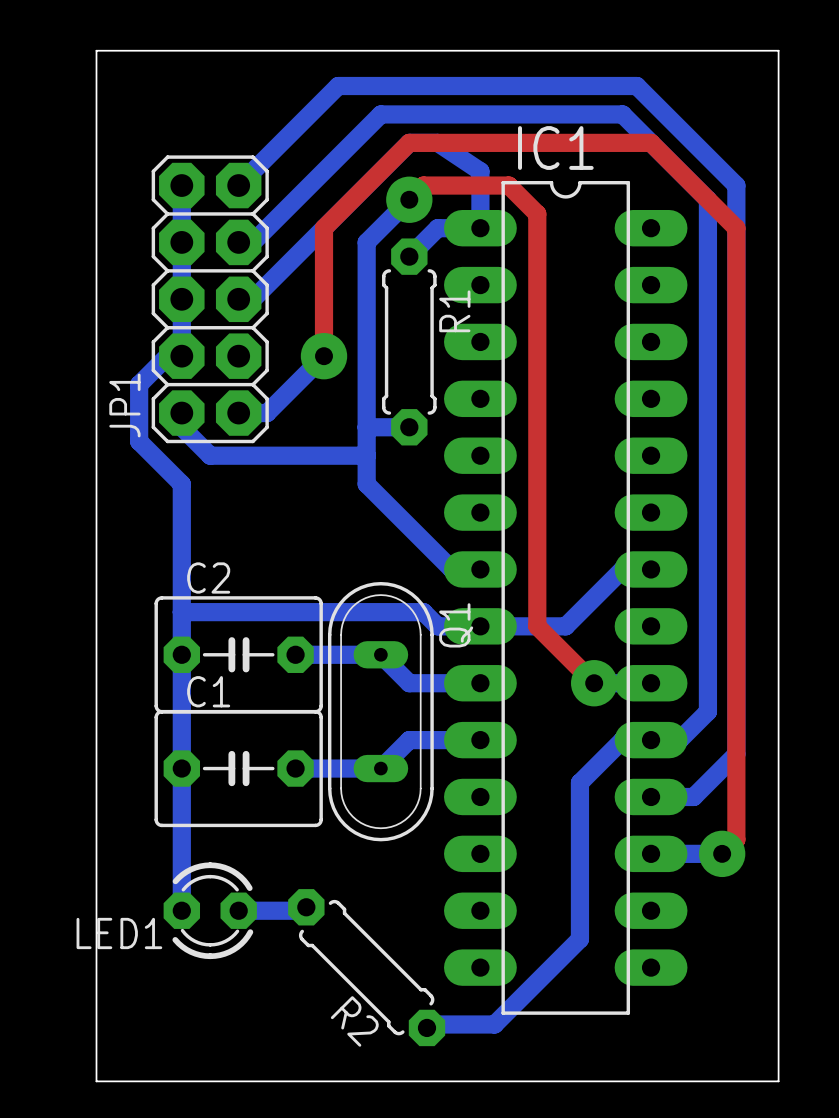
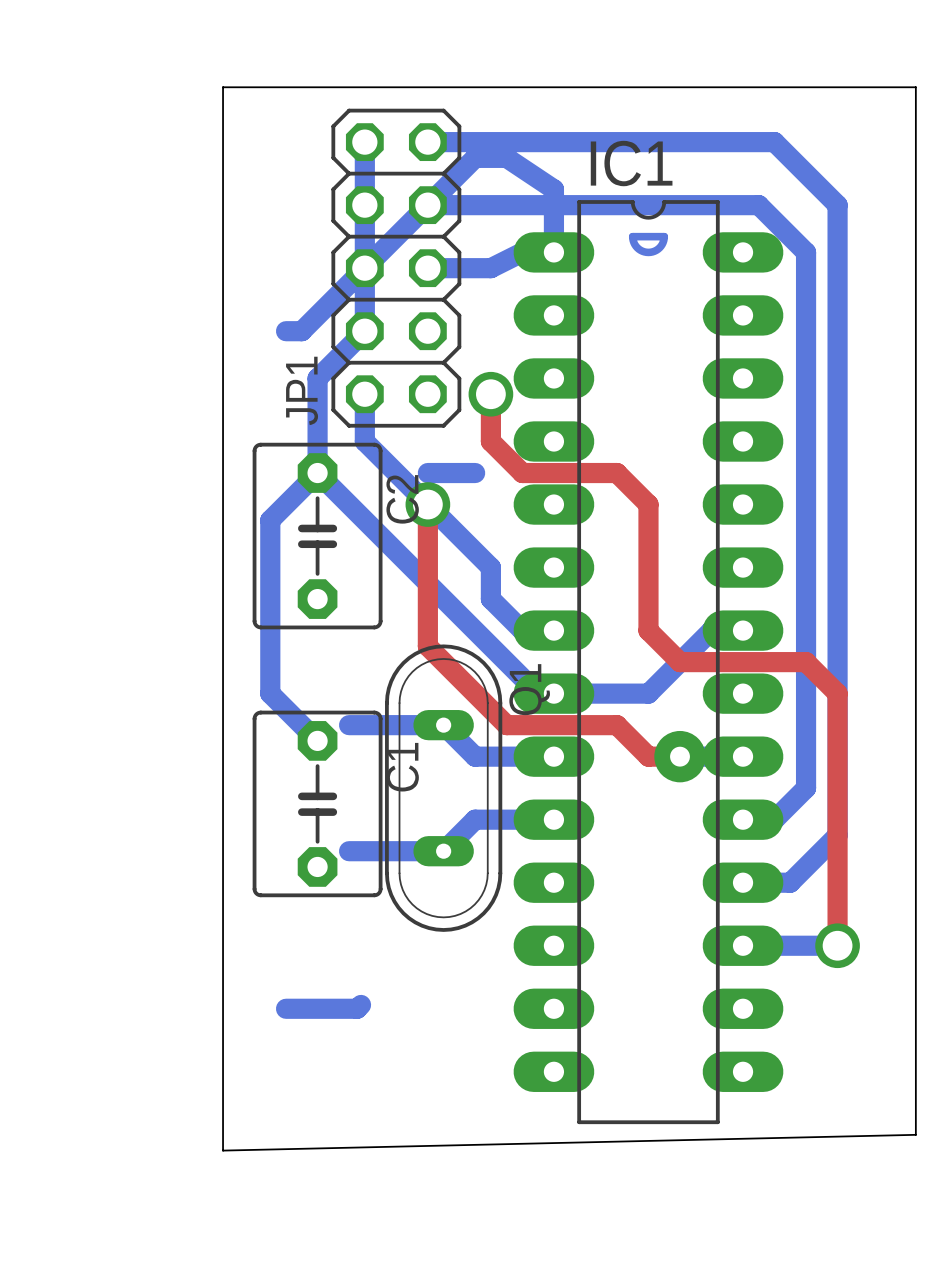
board edge: (96, 50) (778, 50) (778, 1081) (96, 1081) (96, 50) -> (223, 87) (223, 1150) (915, 1134) (915, 87) (223, 87)
bottom track: none -> (364, 142) (364, 331) (317, 378) (317, 473)
bottom track: (679, 128) (636, 86) (338, 86) (238, 185) -> (774, 142) (427, 142)
JP1 footprint: [151, 155, 269, 444] -> [331, 108, 462, 428]
bottom track: (181, 185) (181, 356) (167, 356) (139, 384) (139, 441) (181, 484) (181, 910) -> none
bottom track: (409, 199) (366, 242) (366, 484) (423, 541) -> (364, 394) (364, 441) (490, 567) (490, 599)
top track: (409, 199) (423, 185) (508, 185) (537, 213) (537, 626) (594, 683) -> (427, 504) (427, 646) (506, 725) (616, 725) (648, 756) (679, 756)
via: (409, 199) -> none
bottom track: none -> (632, 236) (664, 236) (659, 247) (648, 252) (637, 247) (632, 236)
bottom track: (451, 228) (437, 228) (409, 256) -> (522, 252) (490, 268) (427, 268)
bottom track: (707, 228) (707, 199) (622, 114) (380, 114) (252, 242) (238, 242) -> (806, 252) (758, 205) (427, 205)
R1: (409, 341) -> none
bottom track: (324, 356) (267, 413) (238, 413) -> none
top track: (324, 356) (324, 228) (409, 142) (651, 142) (736, 228) (736, 626) -> (490, 394) (490, 441) (522, 473) (616, 473) (648, 504) (648, 630) (679, 662) (806, 662) (837, 693)
via: (324, 356) -> none
via: none -> (490, 394)
bottom track: (181, 413) (181, 427) (210, 455) (366, 455) -> none
bottom track: none -> (317, 473) (270, 520) (270, 693) (317, 740)
via: none -> (427, 504)
bottom track: (181, 612) (423, 612) (437, 626) (466, 626) -> (317, 473) (538, 693)
C2 rotation: 0° (238, 654) -> 90° clockwise (317, 536)
C2 position: (238, 654) -> (317, 536)
bottom track: (651, 740) (622, 740) (579, 782) (579, 939) (494, 1024) (430, 1024) (426, 1027) -> none
C1 rotation: 0° (238, 768) -> 90° clockwise (317, 803)
via position: (722, 853) -> (837, 945)
LED1: (210, 910) -> none
R2: (366, 967) -> none

